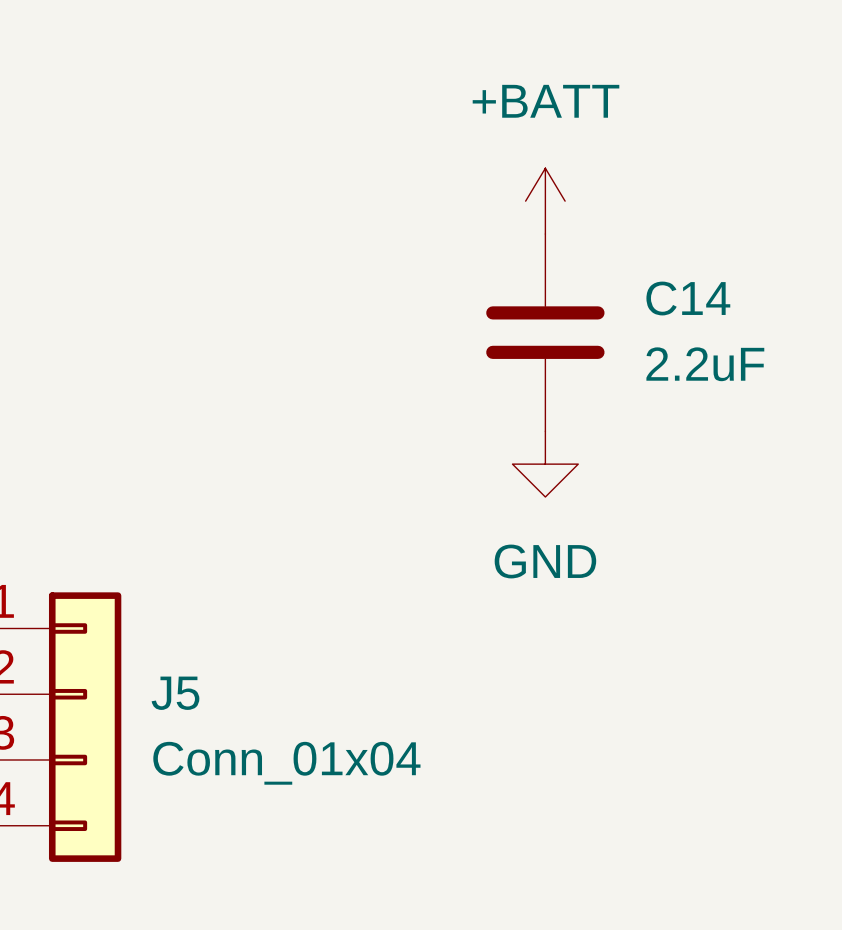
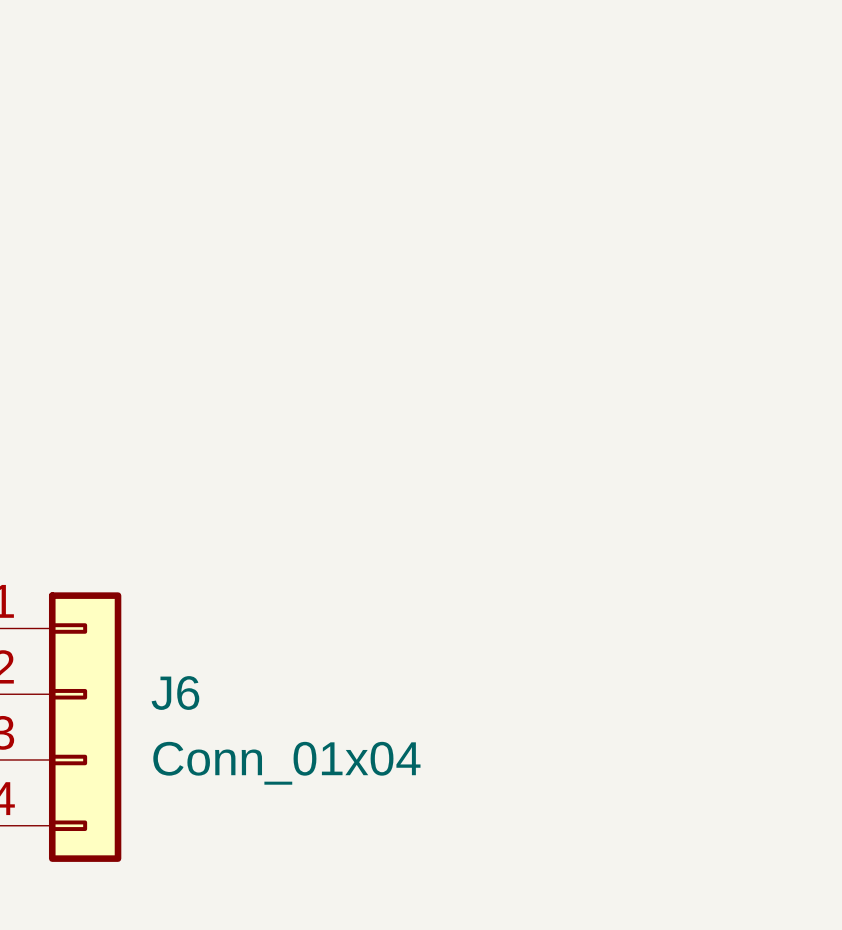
power symbol: +BATT (545, 201) -> none
C14: 2.2uF (545, 332) -> none
power symbol: GND (545, 464) -> none
J5 name: J5 (175, 693) -> J6 (175, 693)

